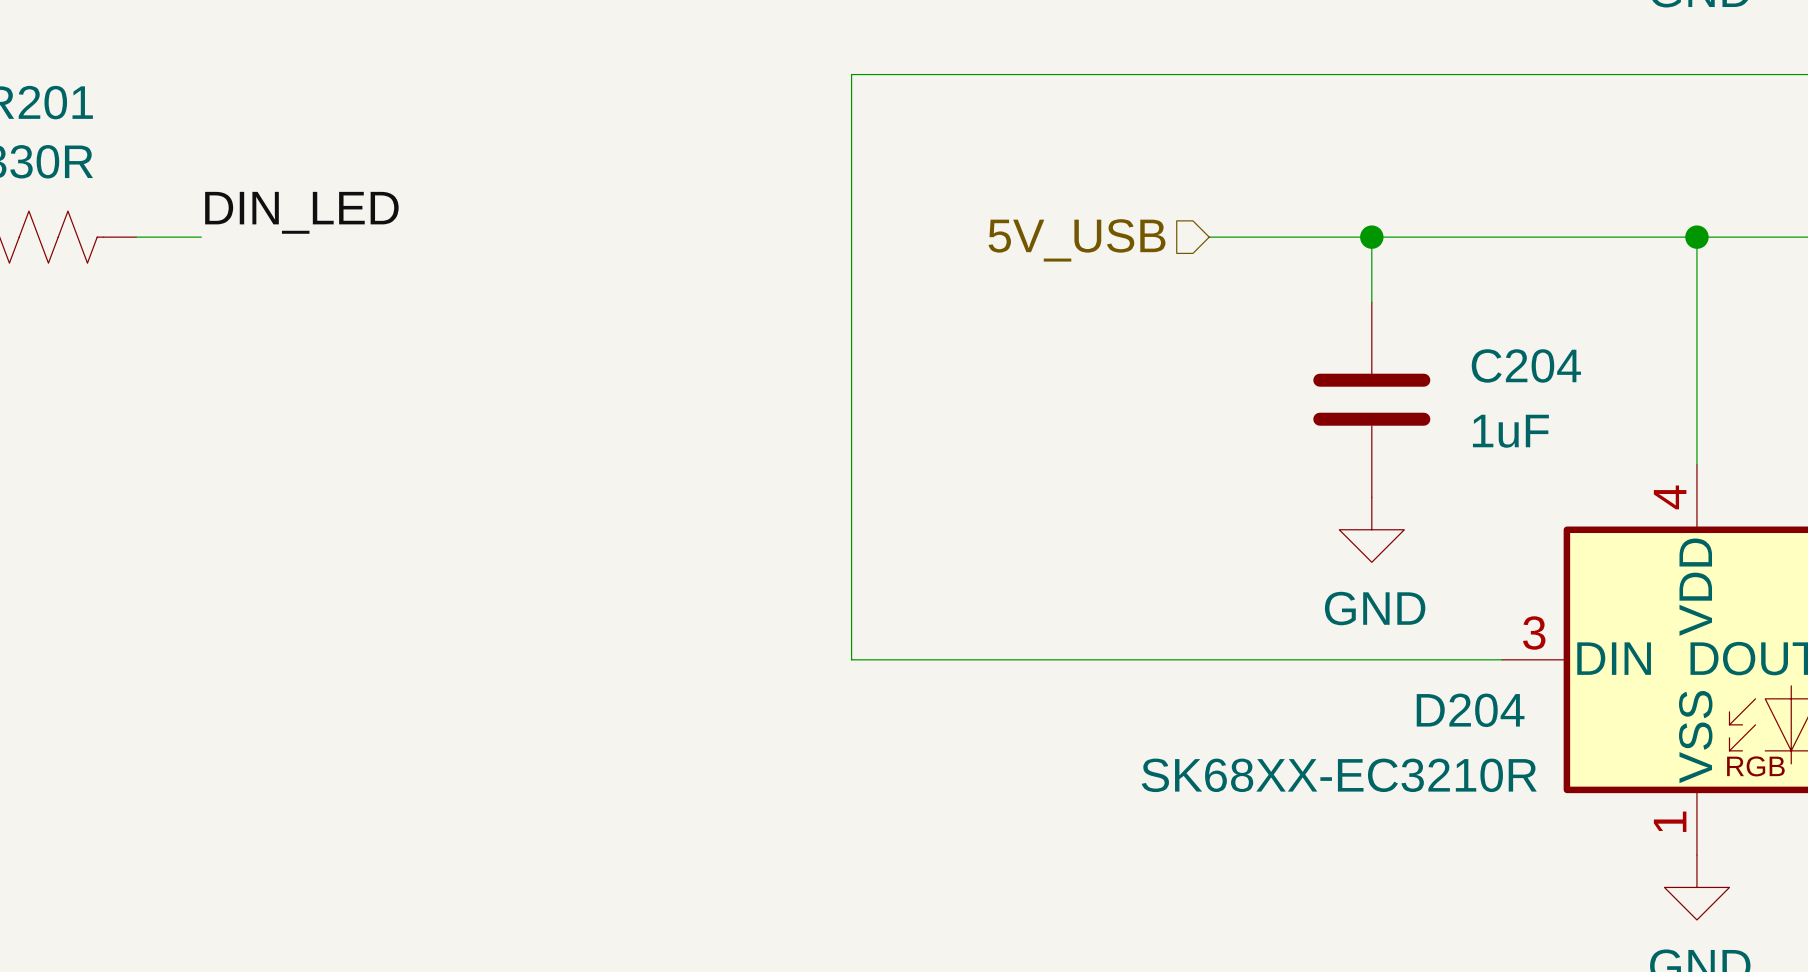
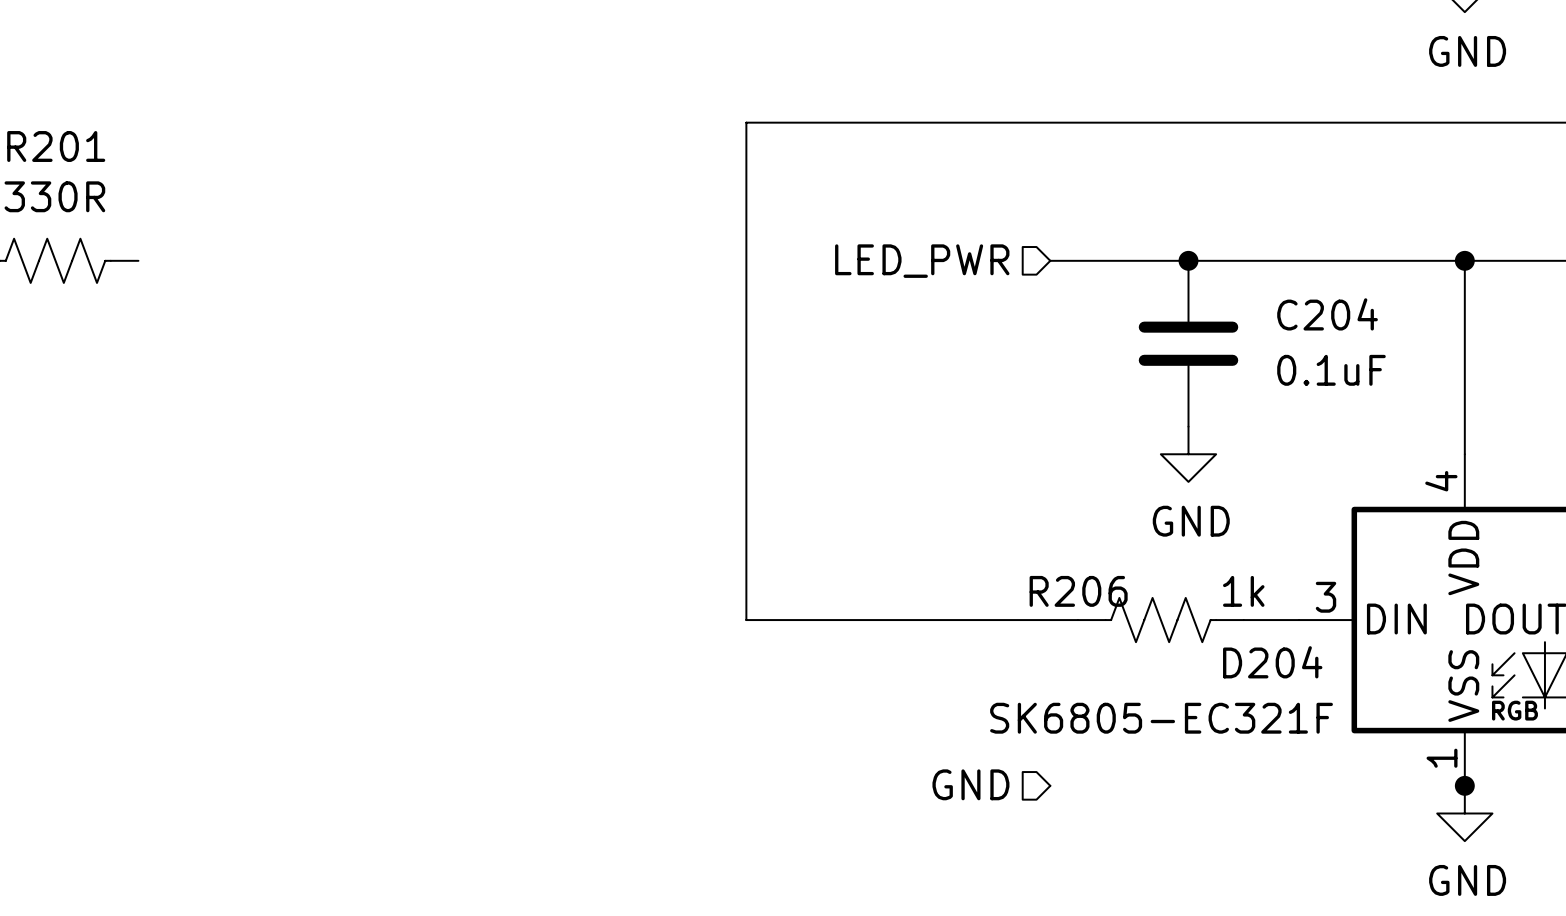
label: DIN_LED (301, 212) -> none
wire: (136, 237) (201, 237) -> none
hierarchical label: 5V_USB (1077, 240) -> LED_PWR (922, 261)
C204 position: (1371, 399) -> (1188, 343)
C204 value: 1uF (1510, 431) -> 0.1uF (1331, 370)
power symbol position: GND (1371, 529) -> GND (1188, 454)
wire: (1241, 659) (1436, 659) -> none
R206: none -> 1k (1160, 620)
D204 value: SK68XX-EC3210R (1339, 775) -> SK6805-EC321F (1161, 718)
hierarchical label: none -> GND (970, 784)
junction: none -> (1464, 785)

